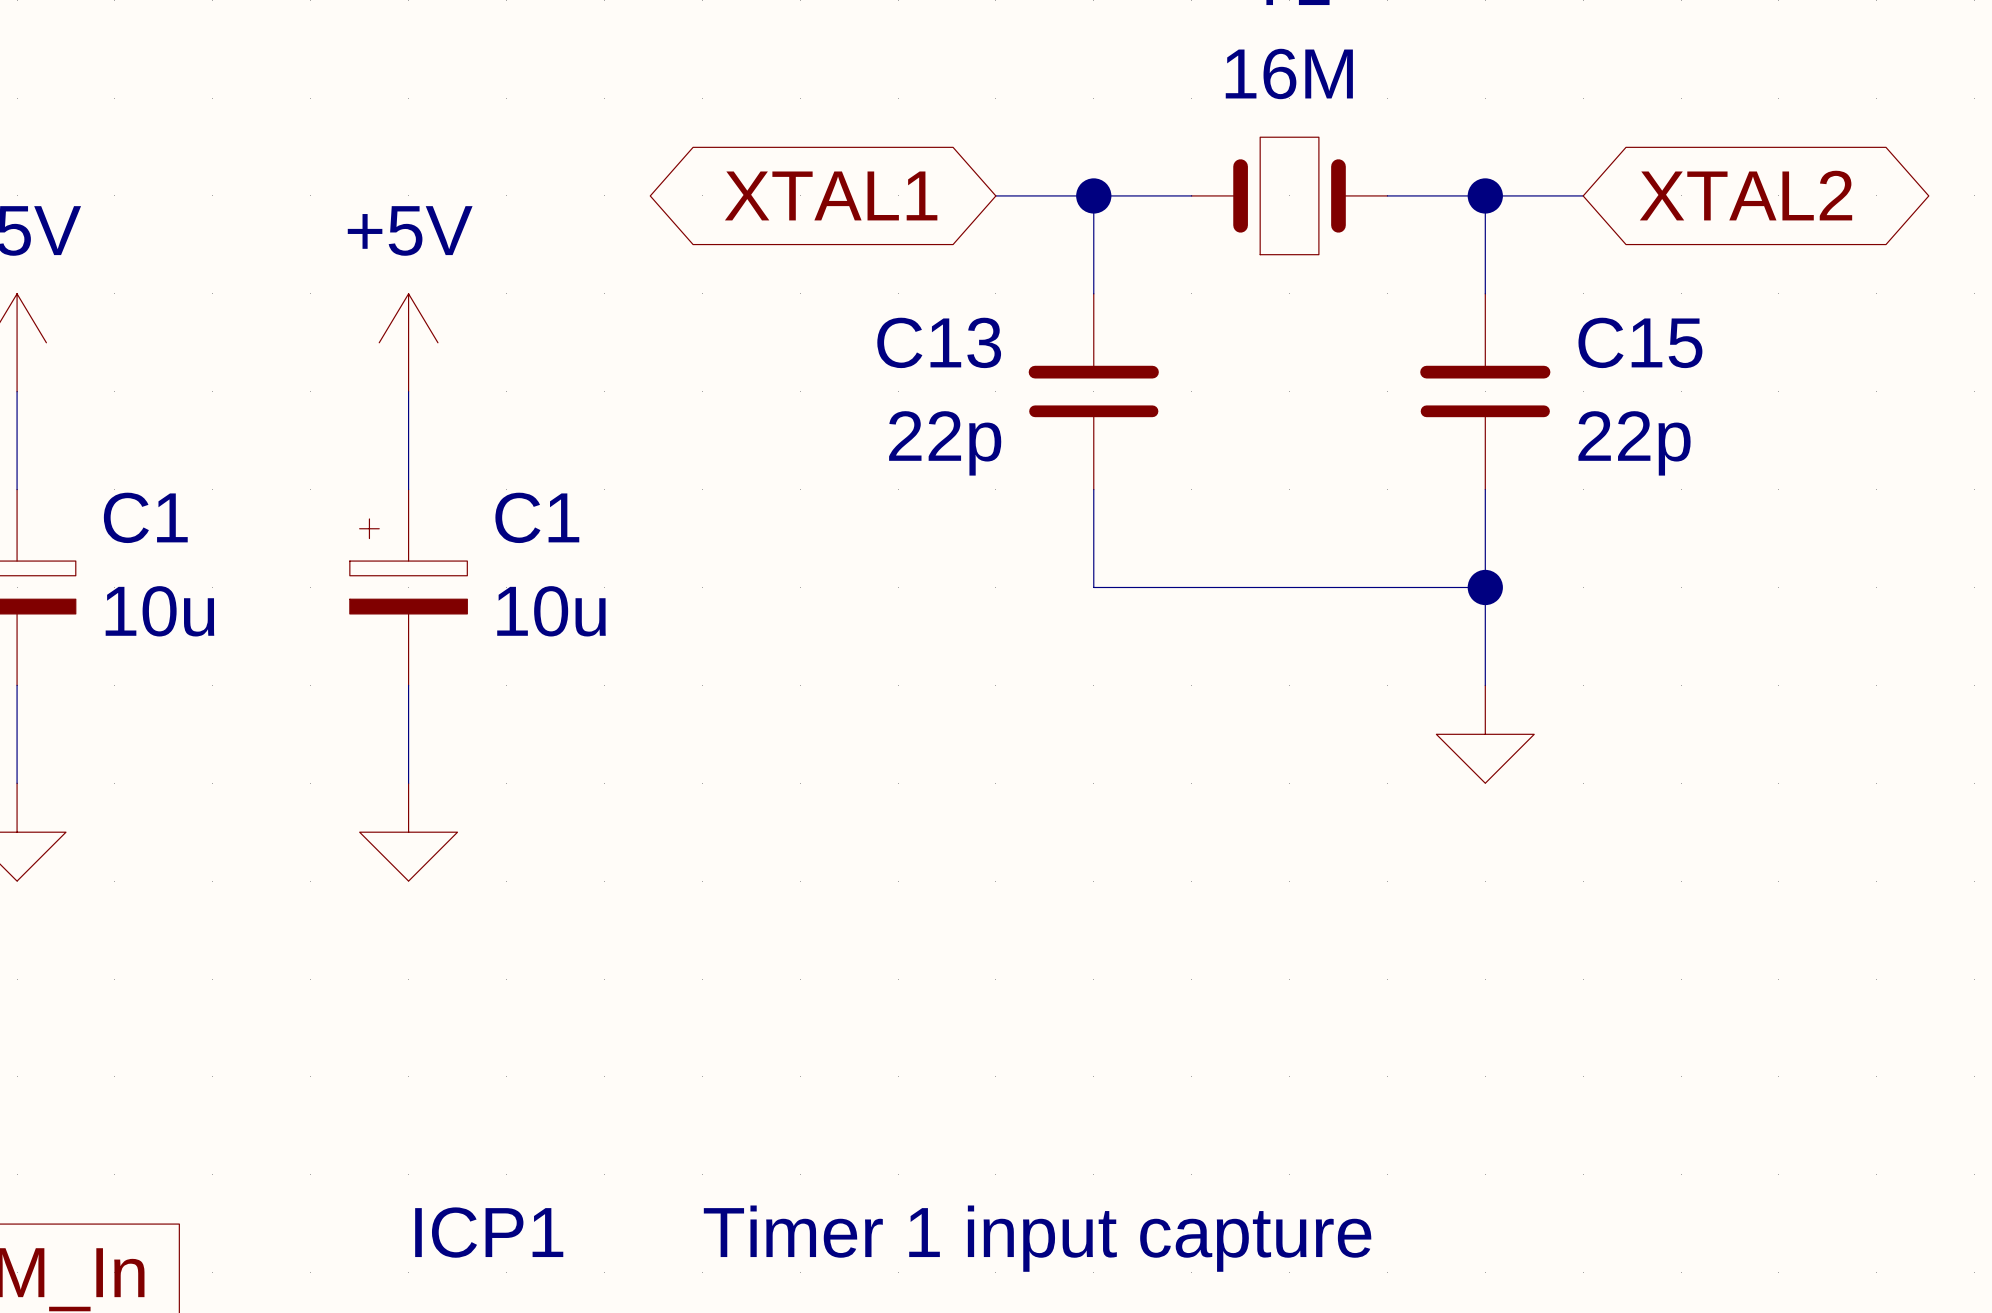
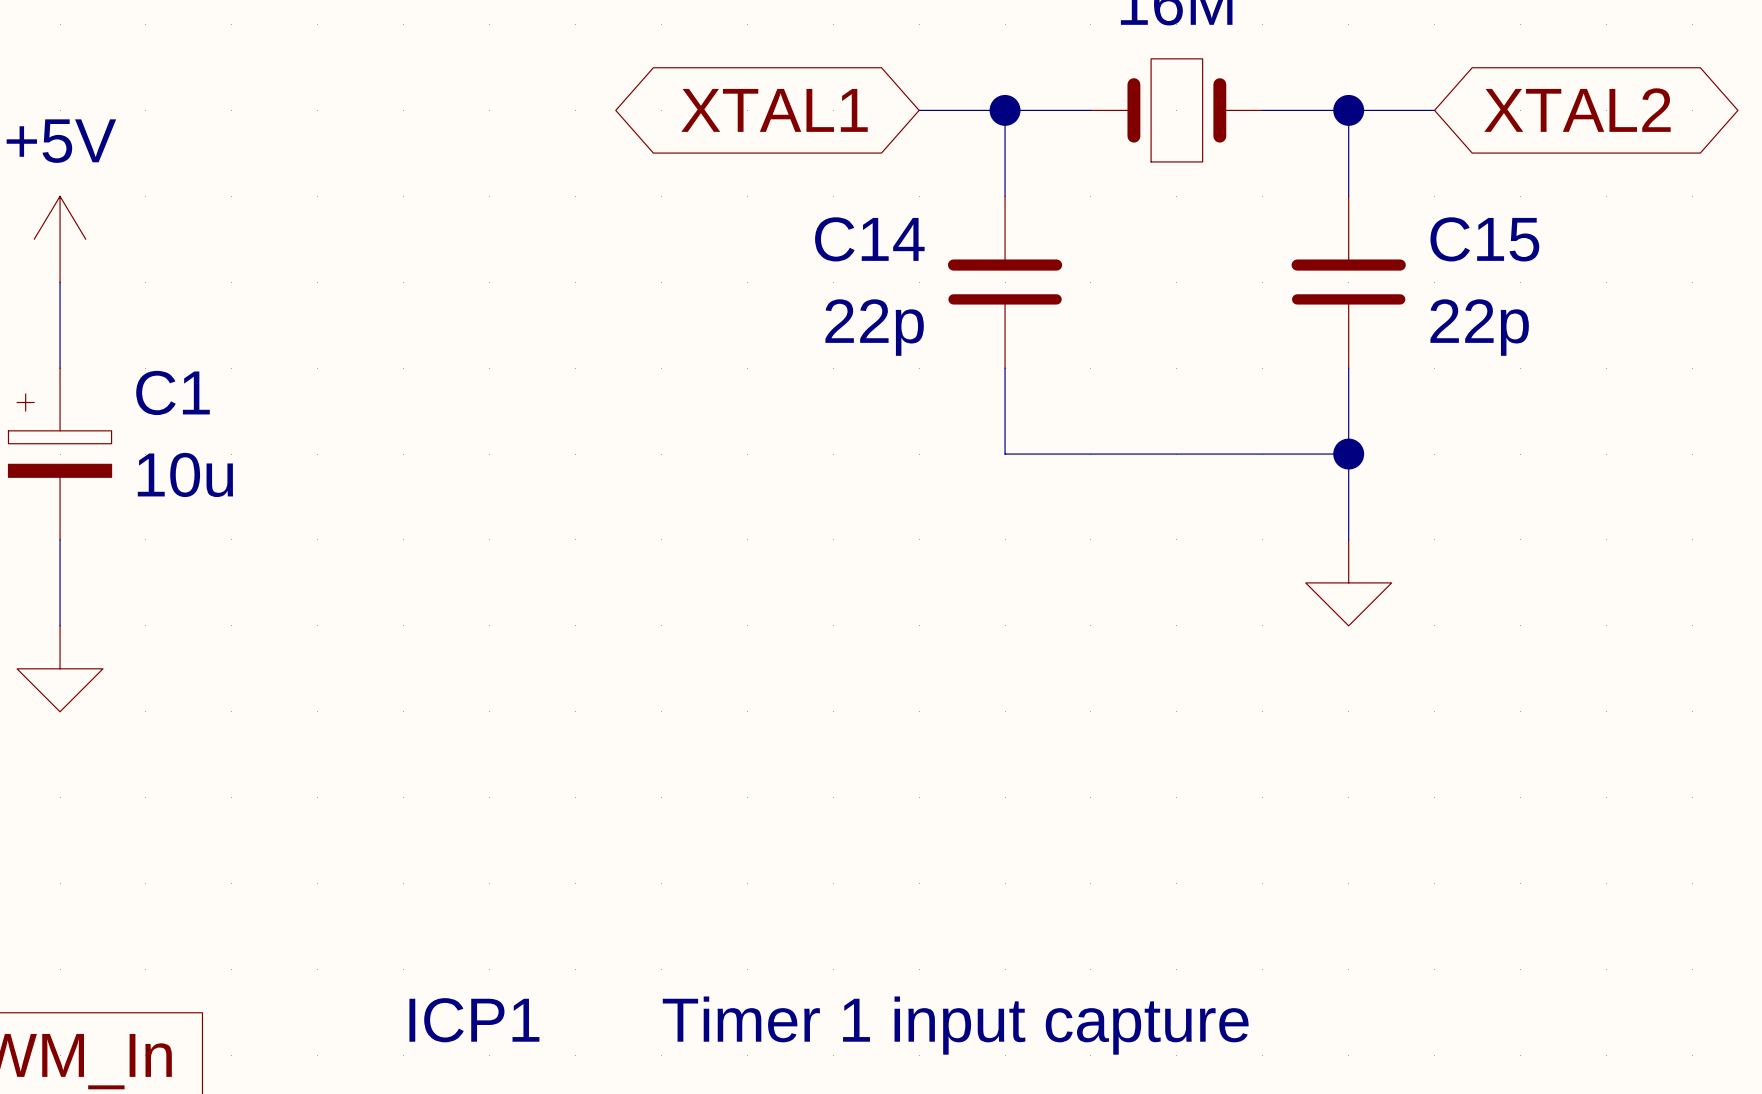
power symbol: +5V (408, 342) -> none
C13 name: C13 (939, 342) -> C14 (869, 239)
wire: (408, 391) (408, 489) -> none
C1: 10u (408, 587) -> none
wire: (408, 685) (408, 783) -> none
power symbol: (408, 832) -> none

